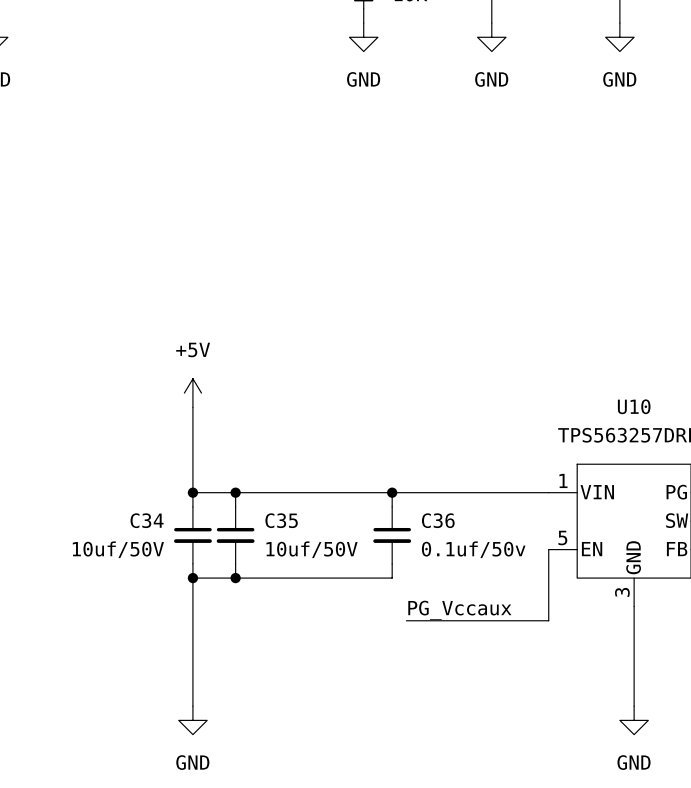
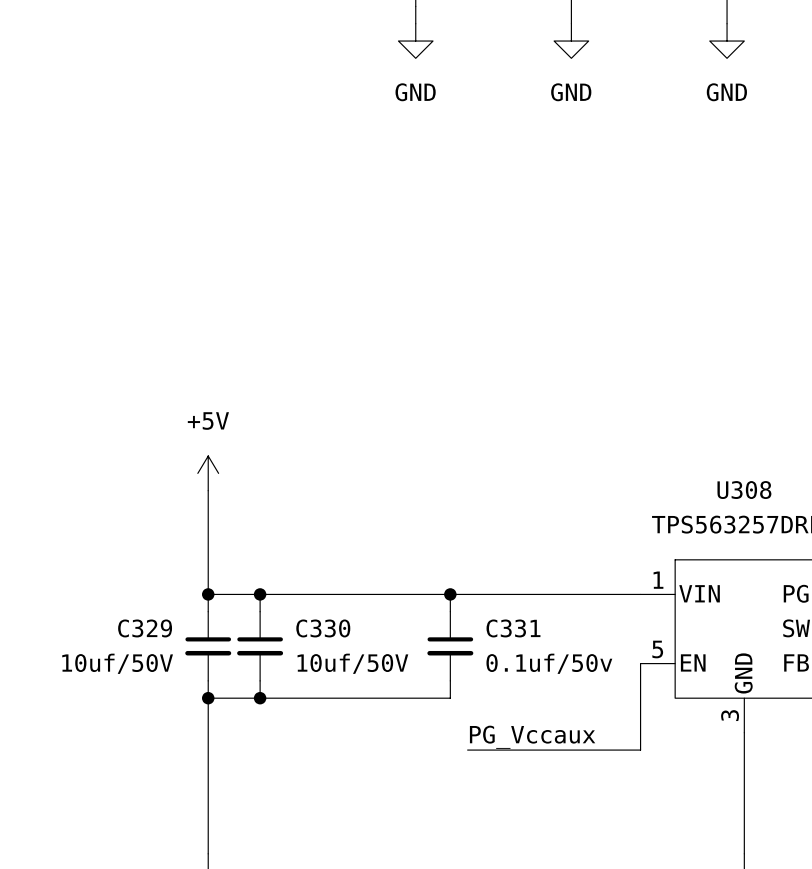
U10 name: U10 (634, 406) -> U308 (744, 490)
C34 name: C34 (147, 520) -> C329 (145, 628)
C35 name: C35 (281, 520) -> C330 (323, 628)
C36 name: C36 (438, 520) -> C331 (513, 628)

